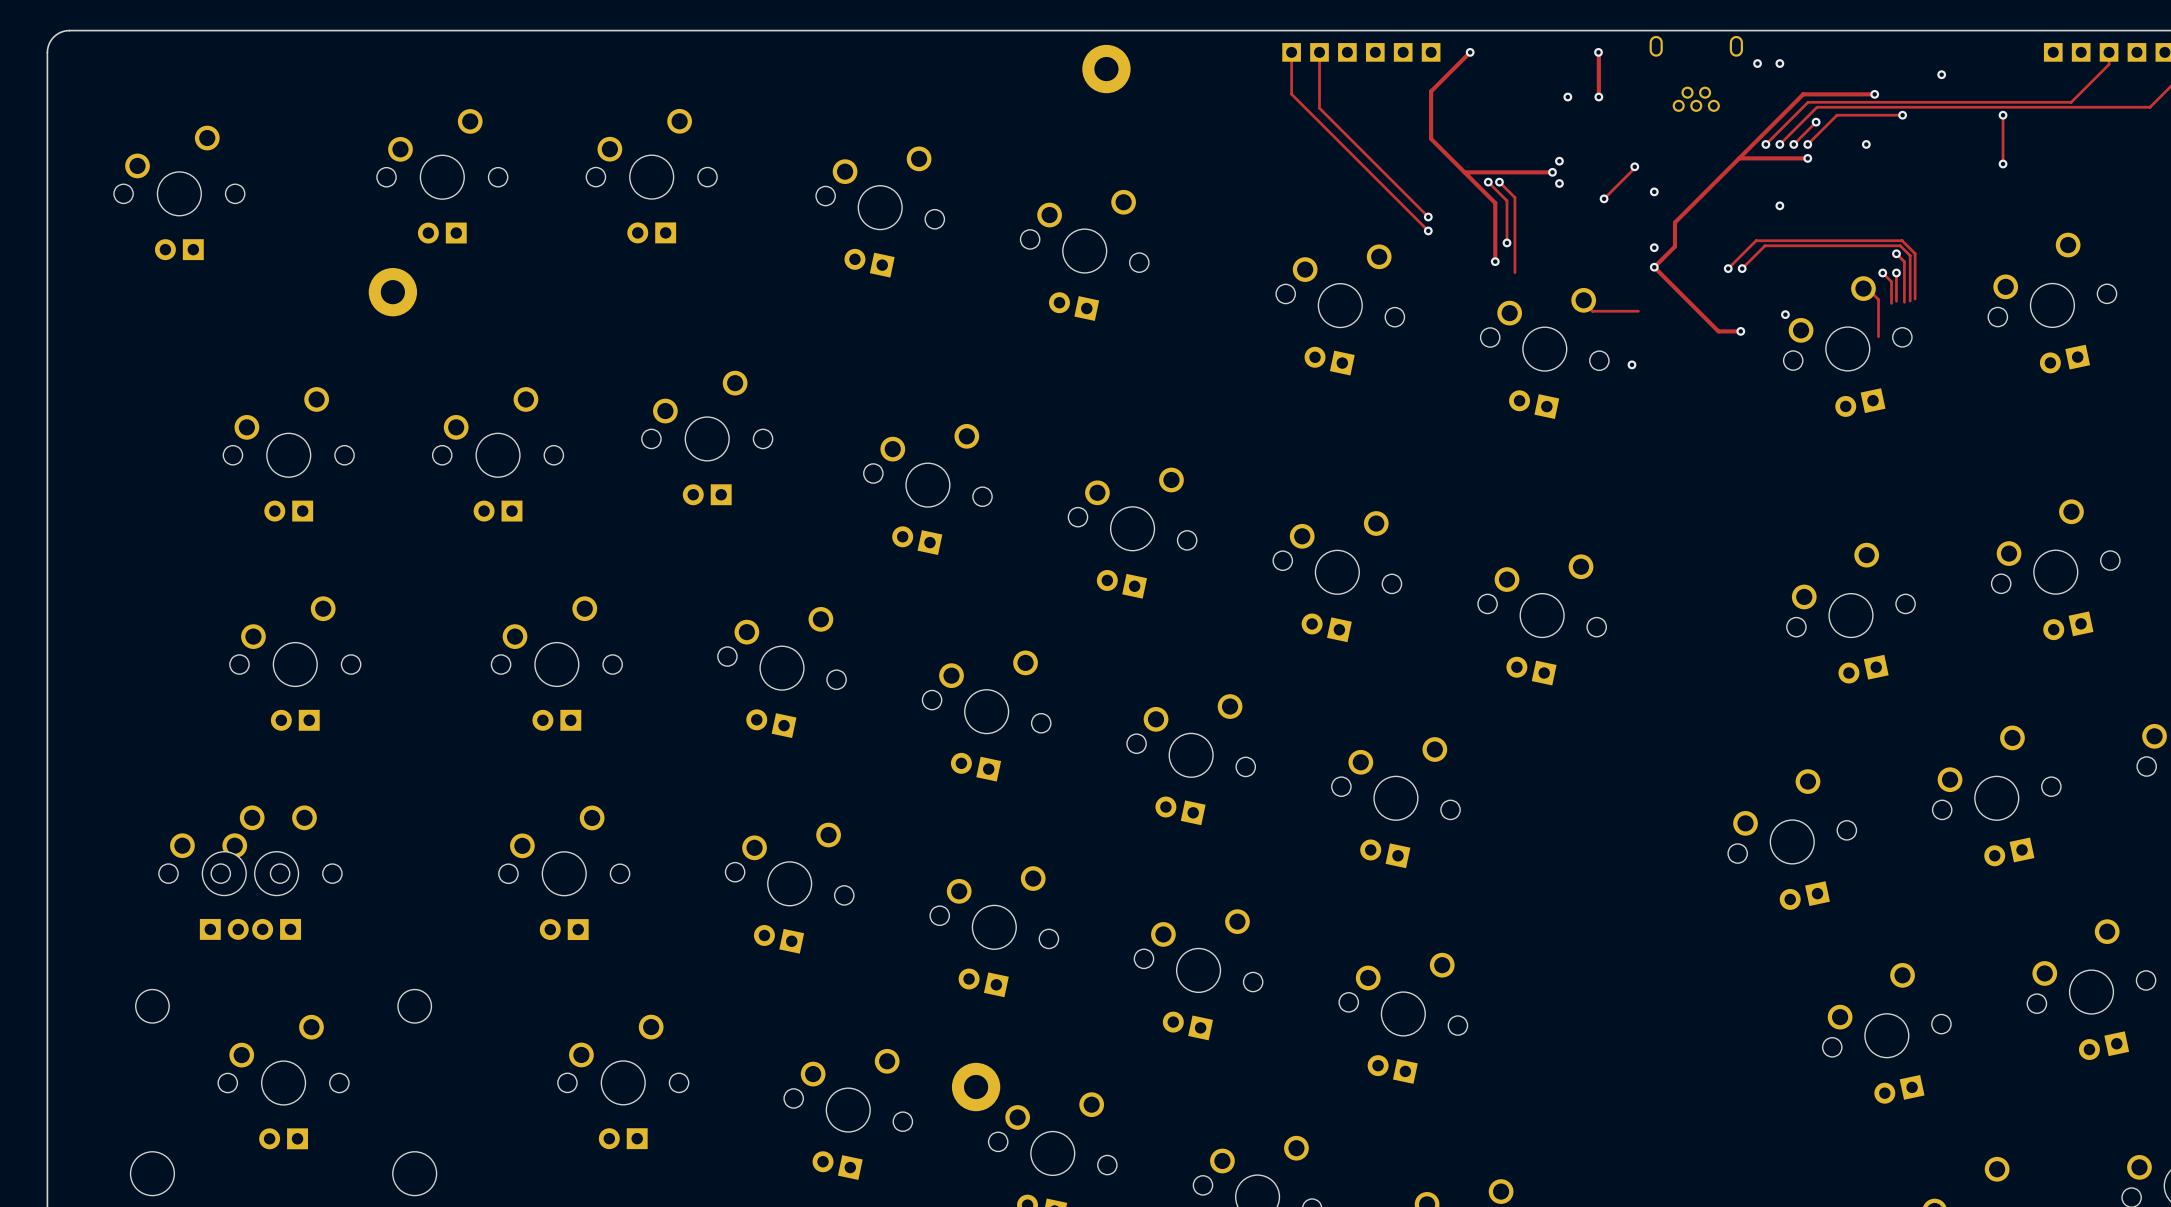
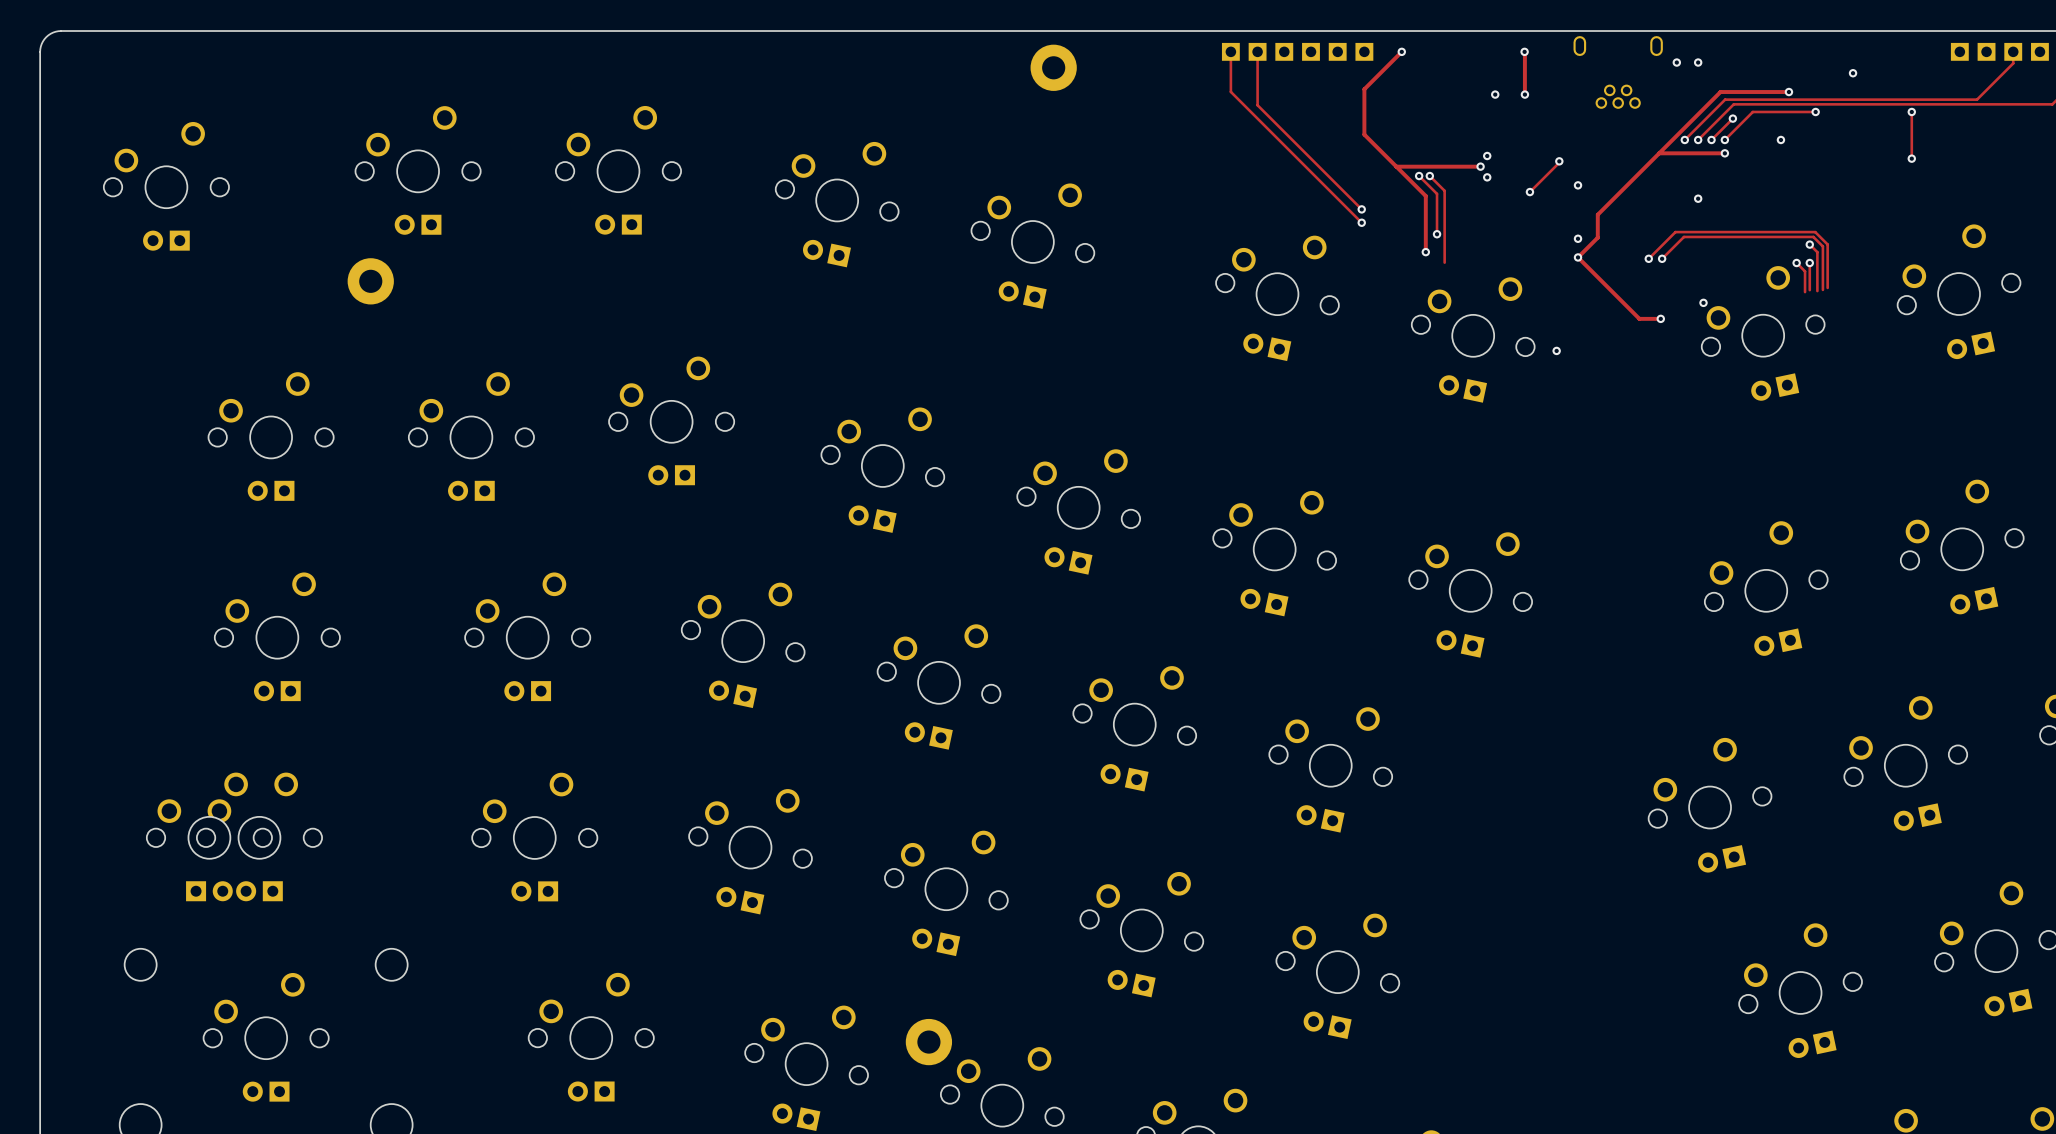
track: (1866, 287) (1878, 299) (1878, 336) -> none
track: (1580, 299) (1592, 311) (1638, 311) -> none

